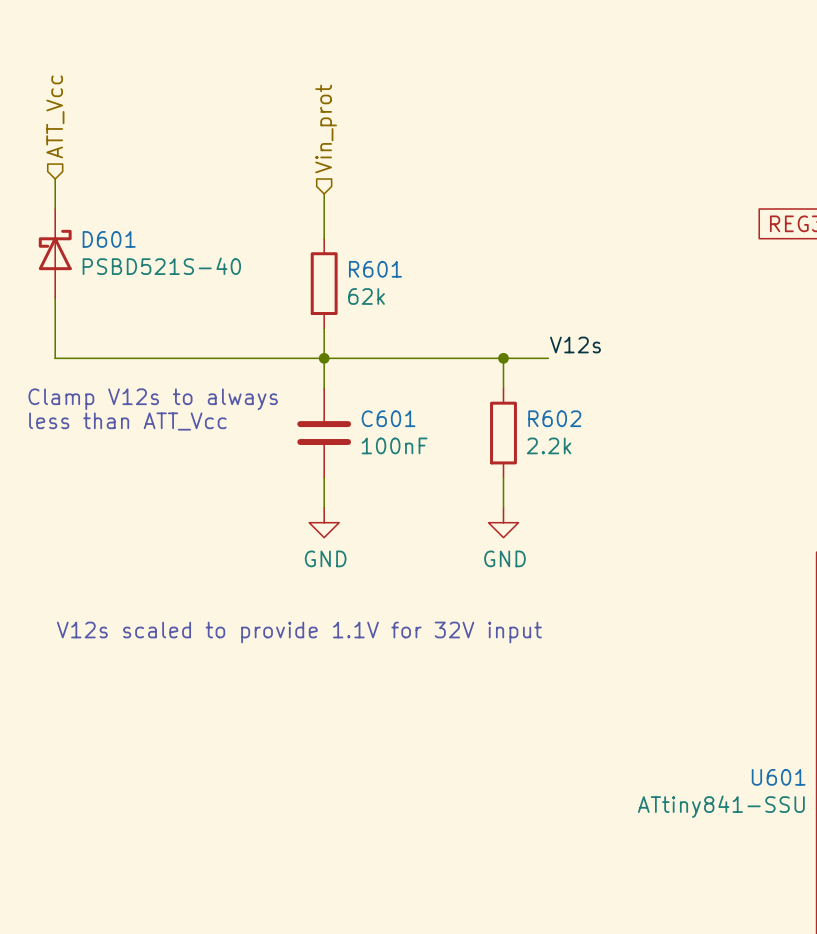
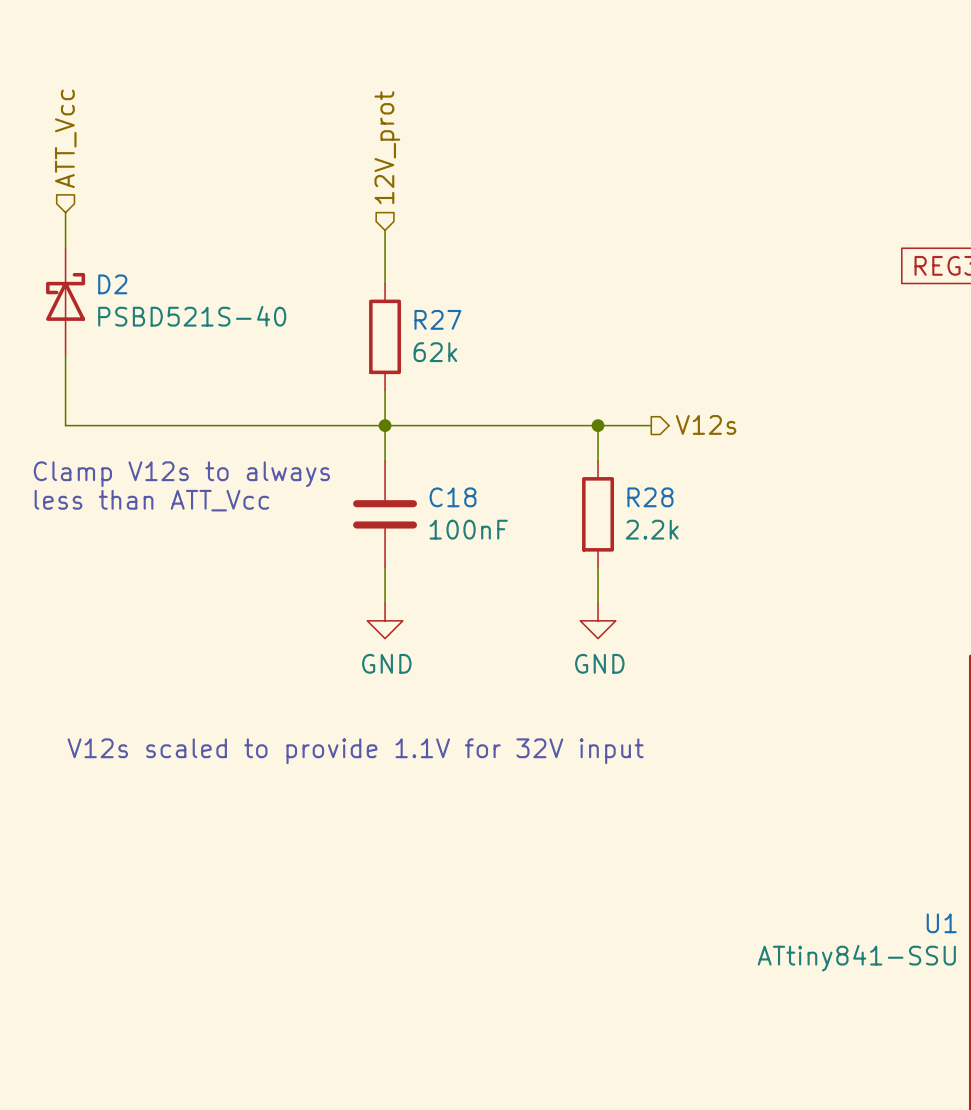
hierarchical label: Vin_prot (326, 128) -> 12V_prot (387, 147)
D601 name: D601 (109, 239) -> D2 (112, 284)
R601 name: R601 (375, 269) -> R27 (437, 319)
label: V12s (575, 344) -> none
hierarchical label: none -> V12s (706, 424)
C601 name: C601 (388, 418) -> C18 (453, 497)
R602 name: R602 (554, 418) -> R28 (650, 497)
U601 name: U601 (778, 777) -> U1 (941, 923)

